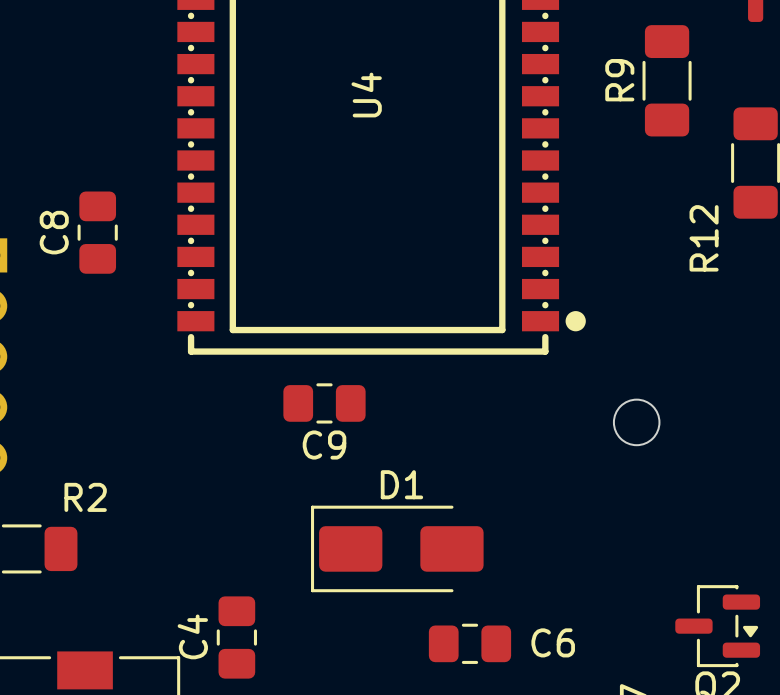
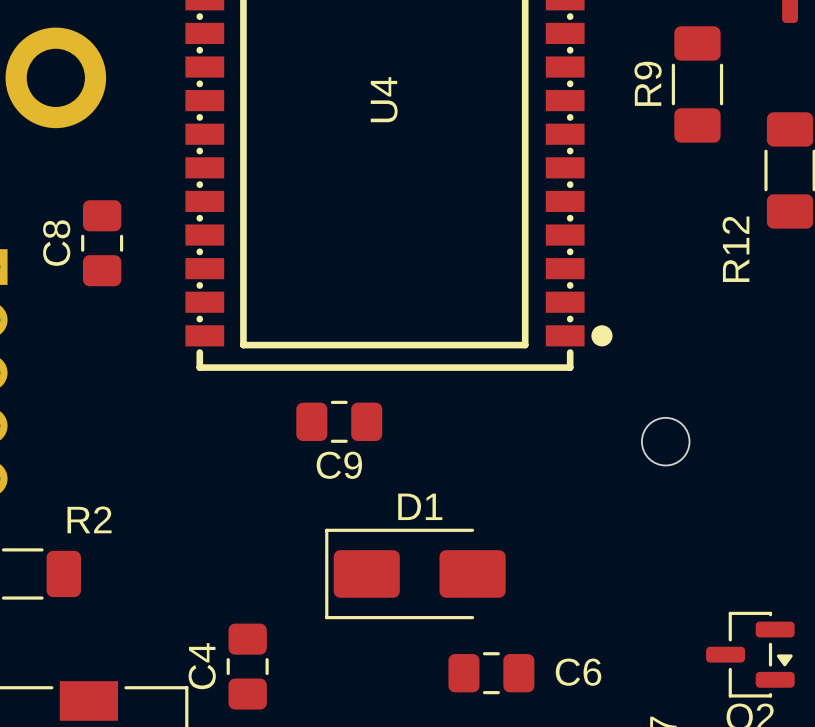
part: none -> (55, 77)

